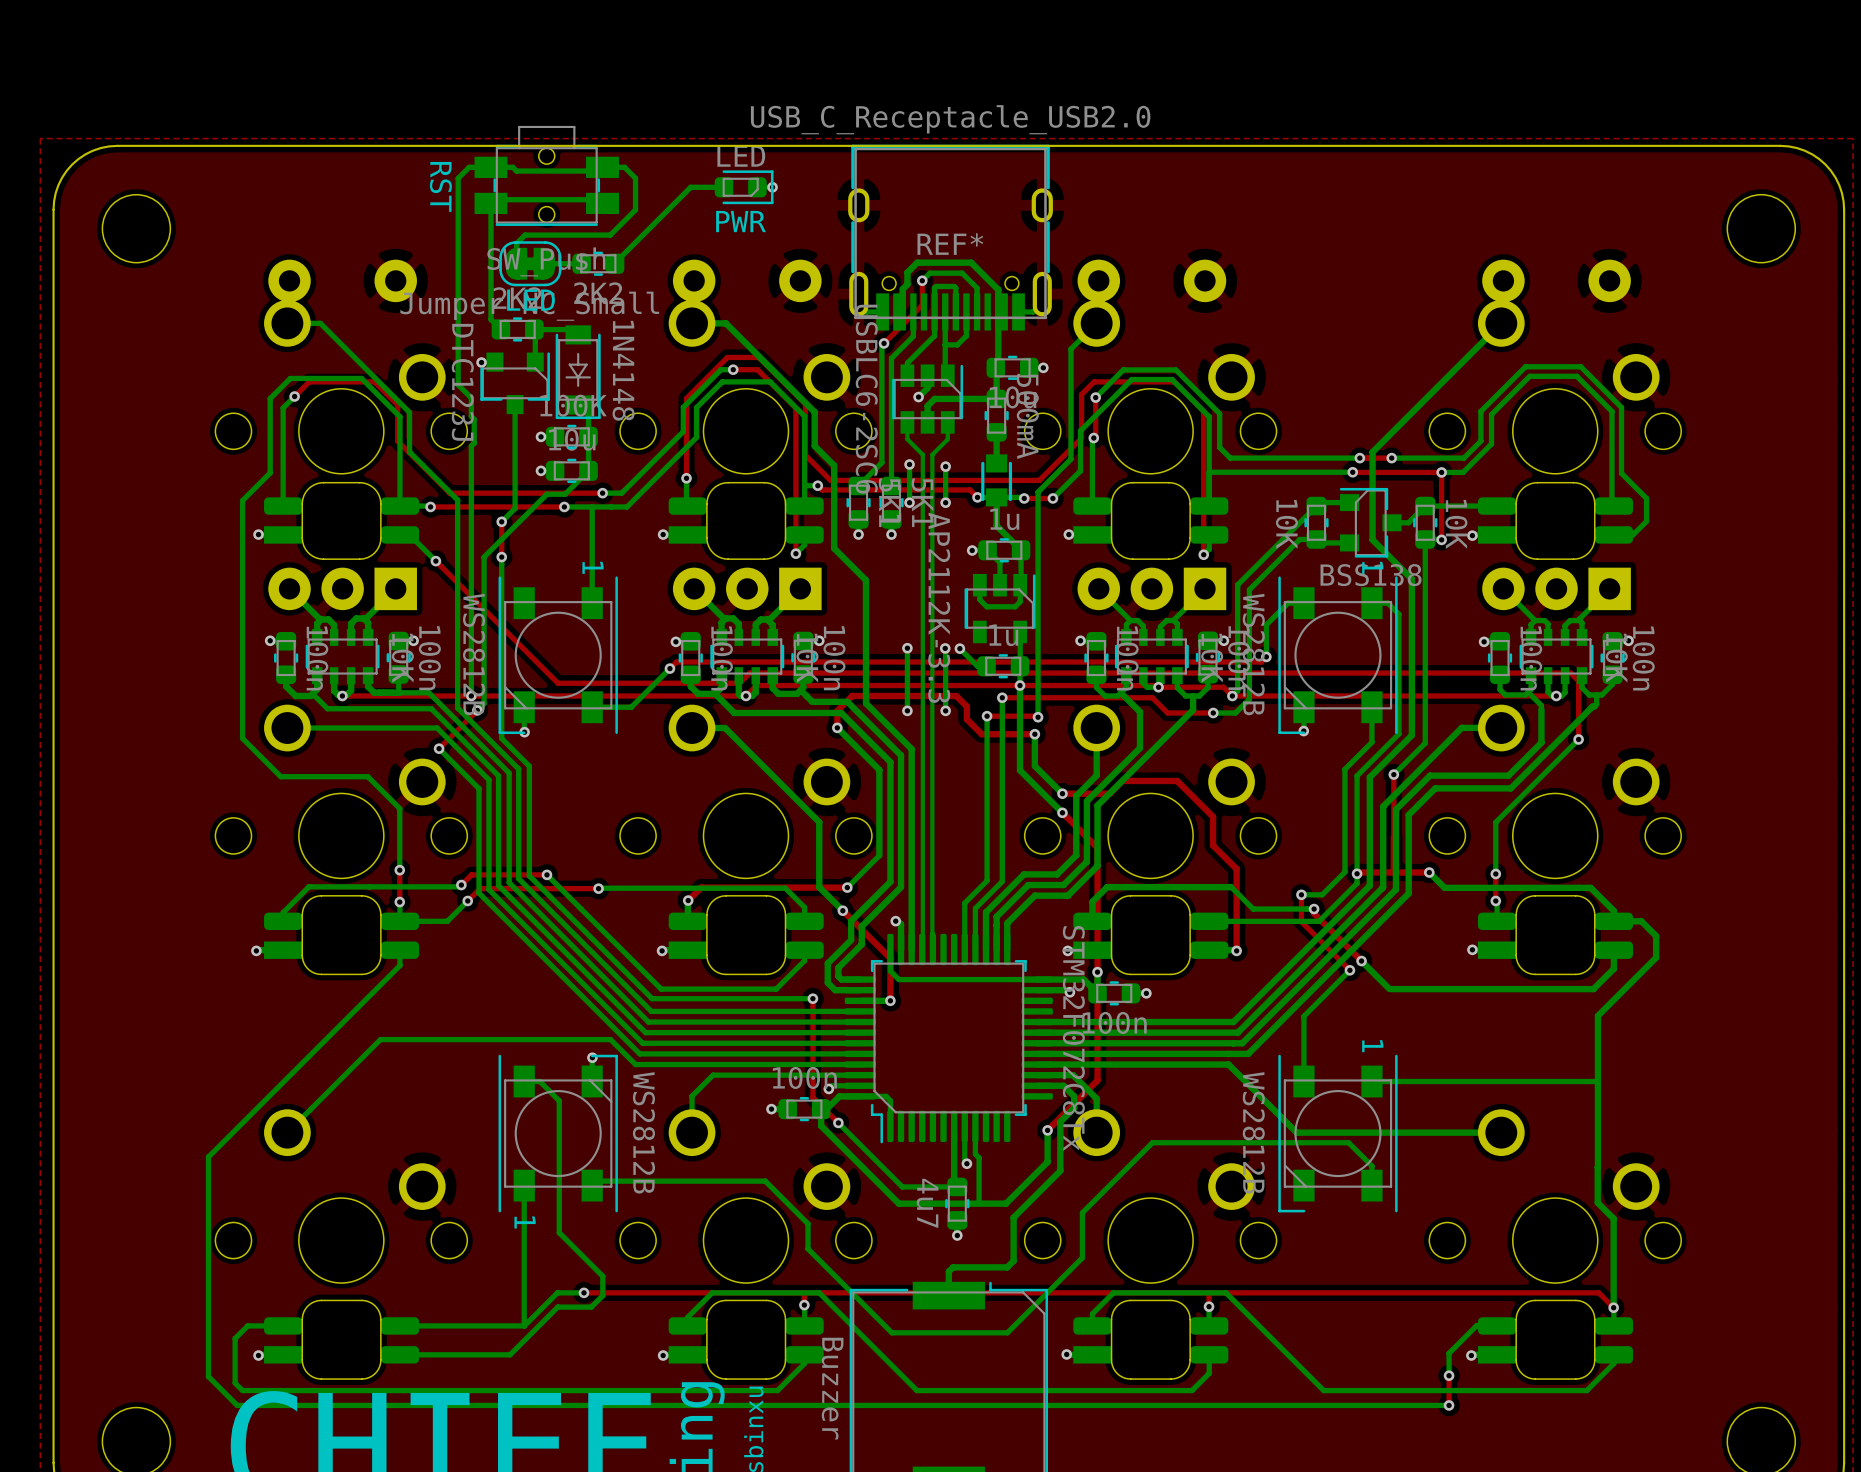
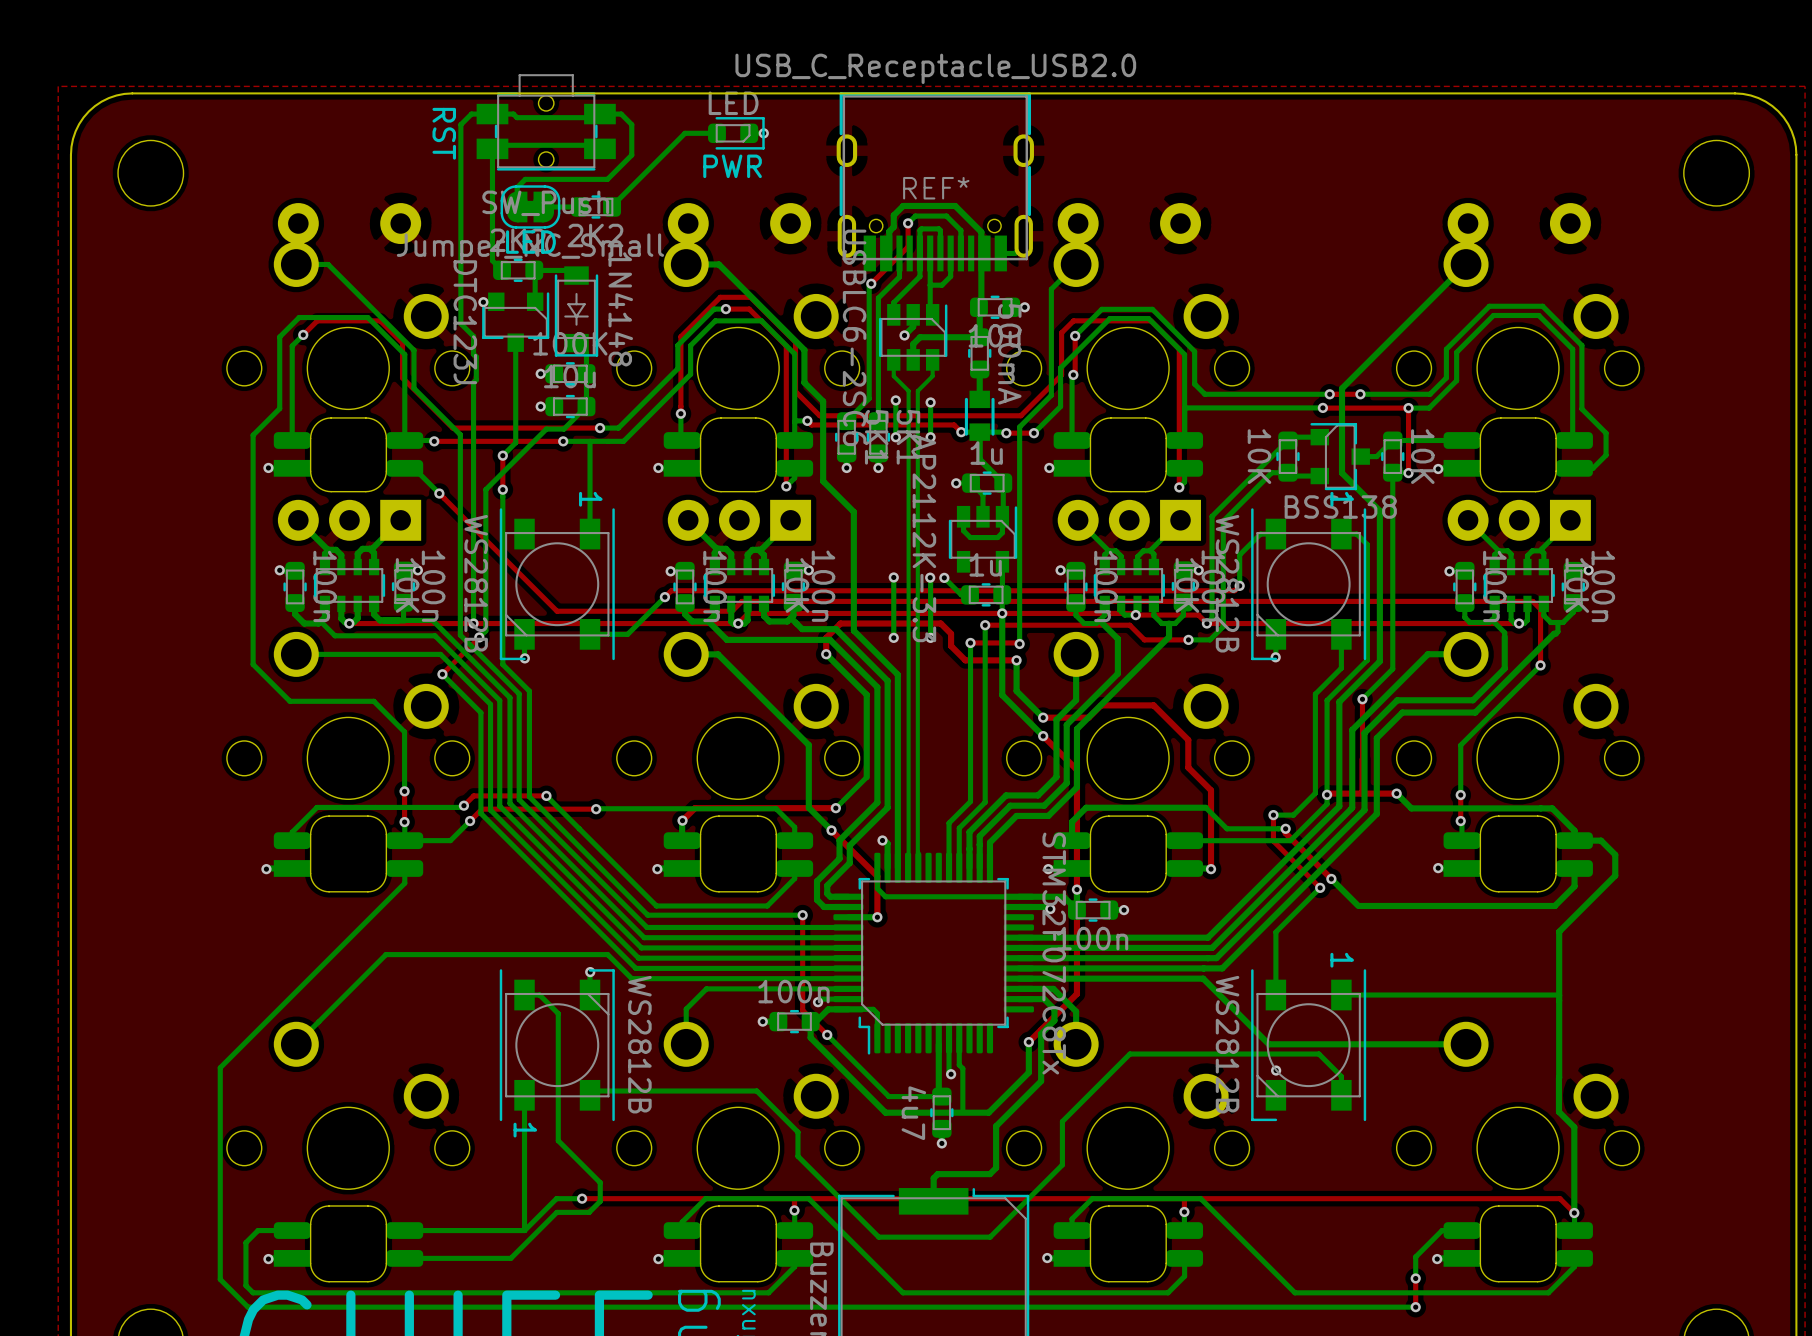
via: none -> (1276, 1070)

